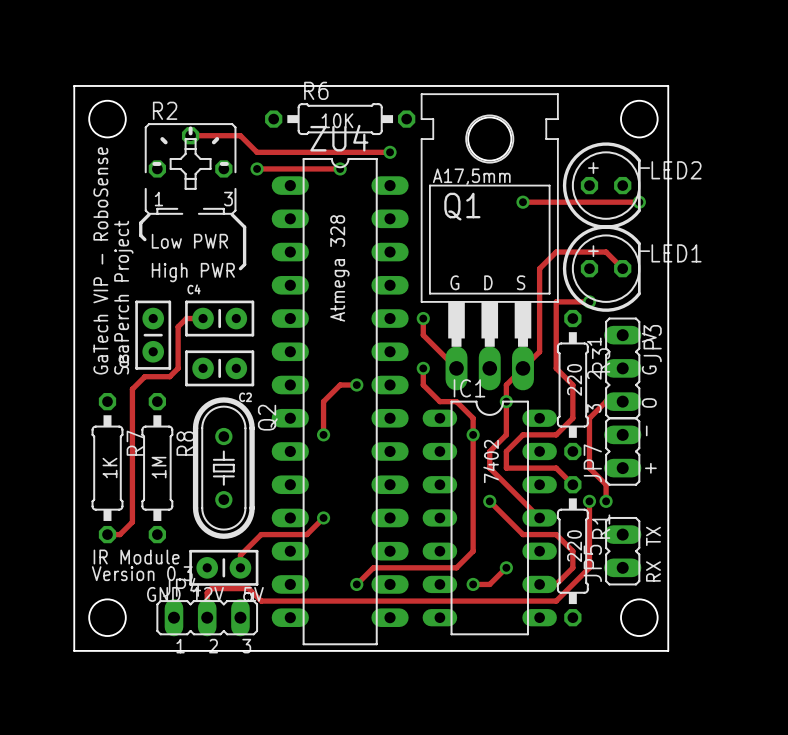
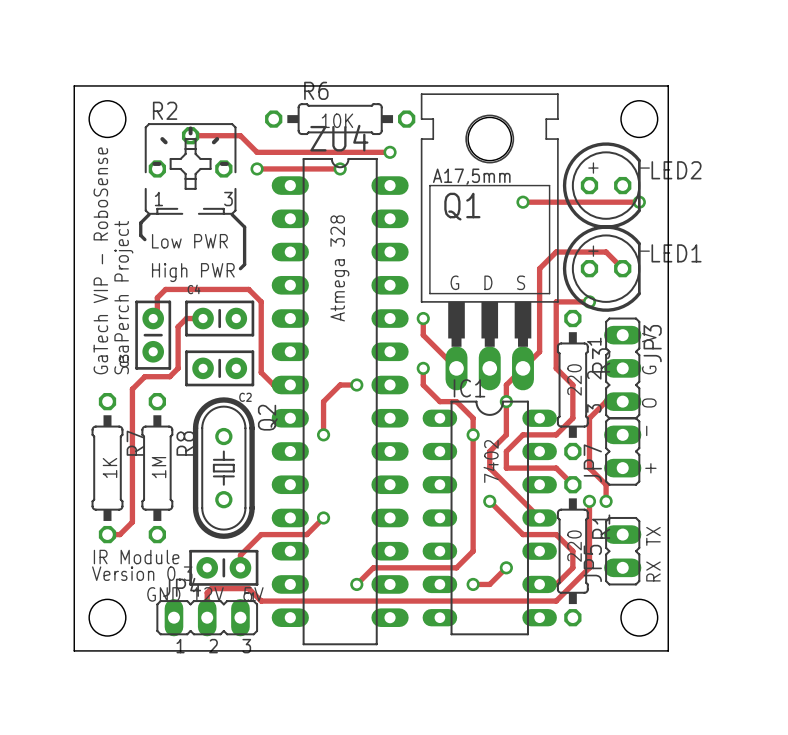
track: none -> (157, 318) (157, 297) (165, 289) (248, 289) (261, 301) (261, 372) (273, 385) (290, 385)

